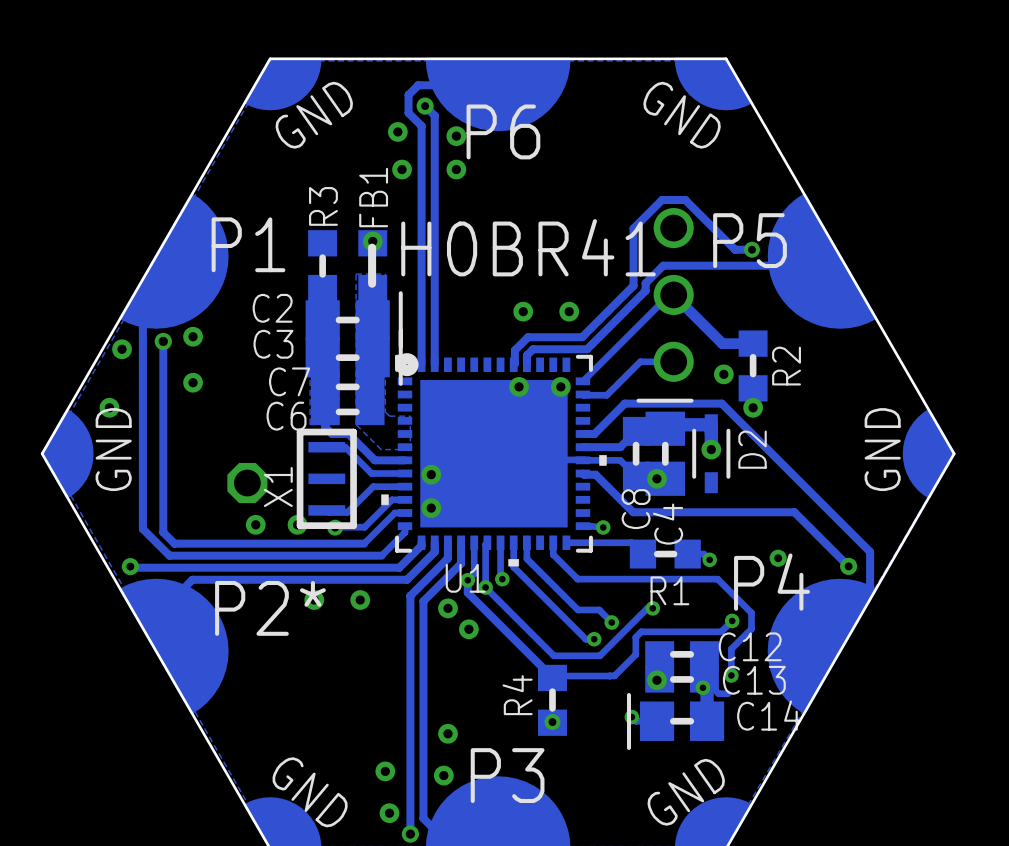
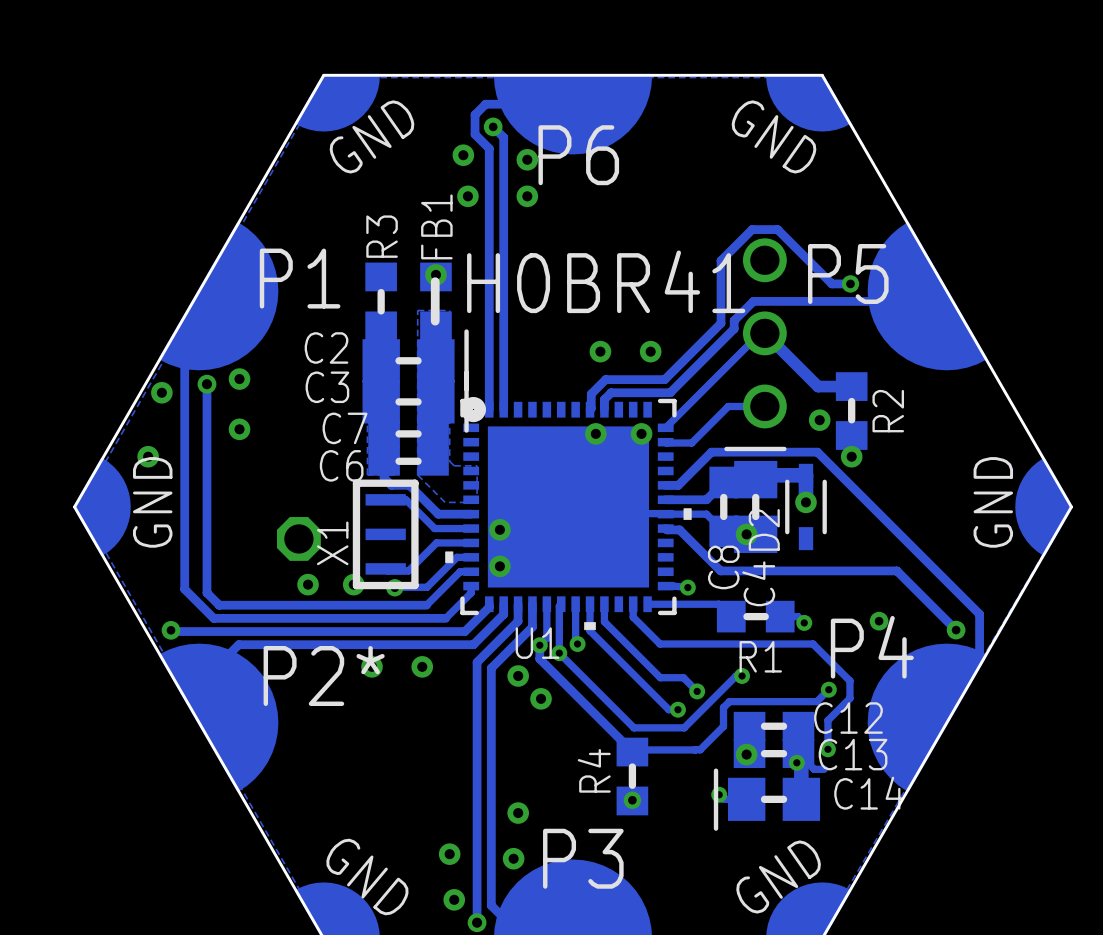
D2 name position: D2 (752, 449) -> D2 (764, 529)

